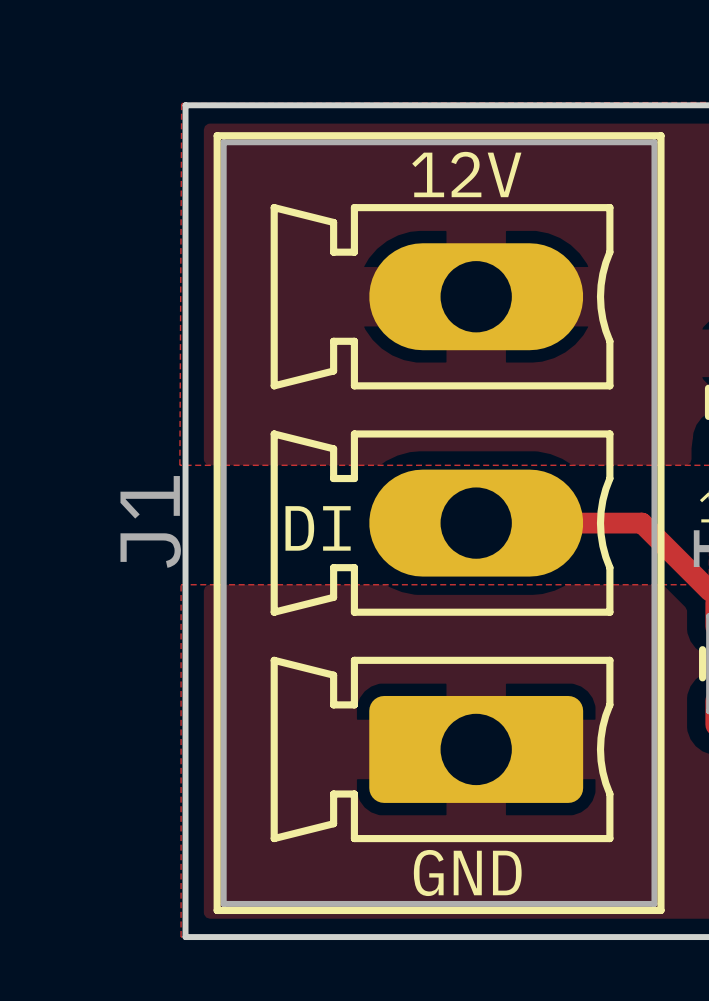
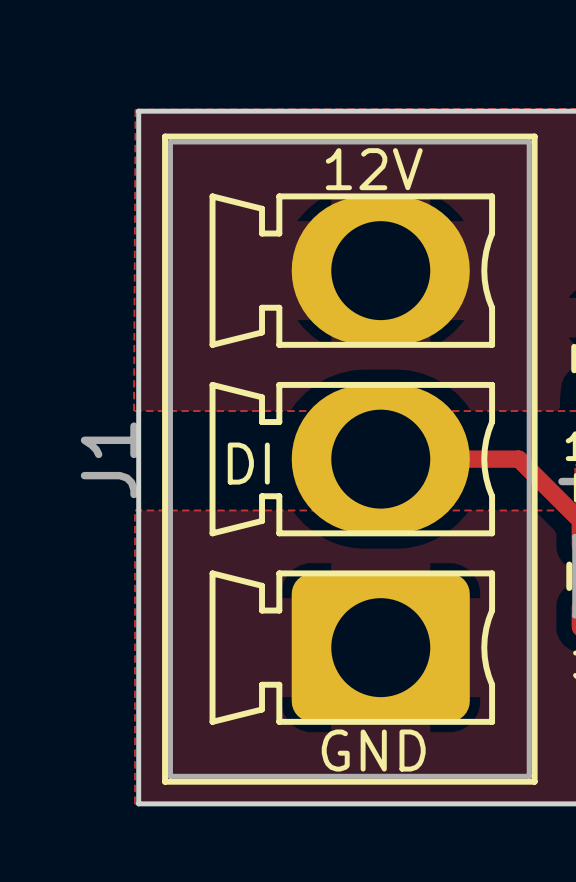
J1 footprint: [213, 132, 665, 915] -> [162, 133, 538, 785]

